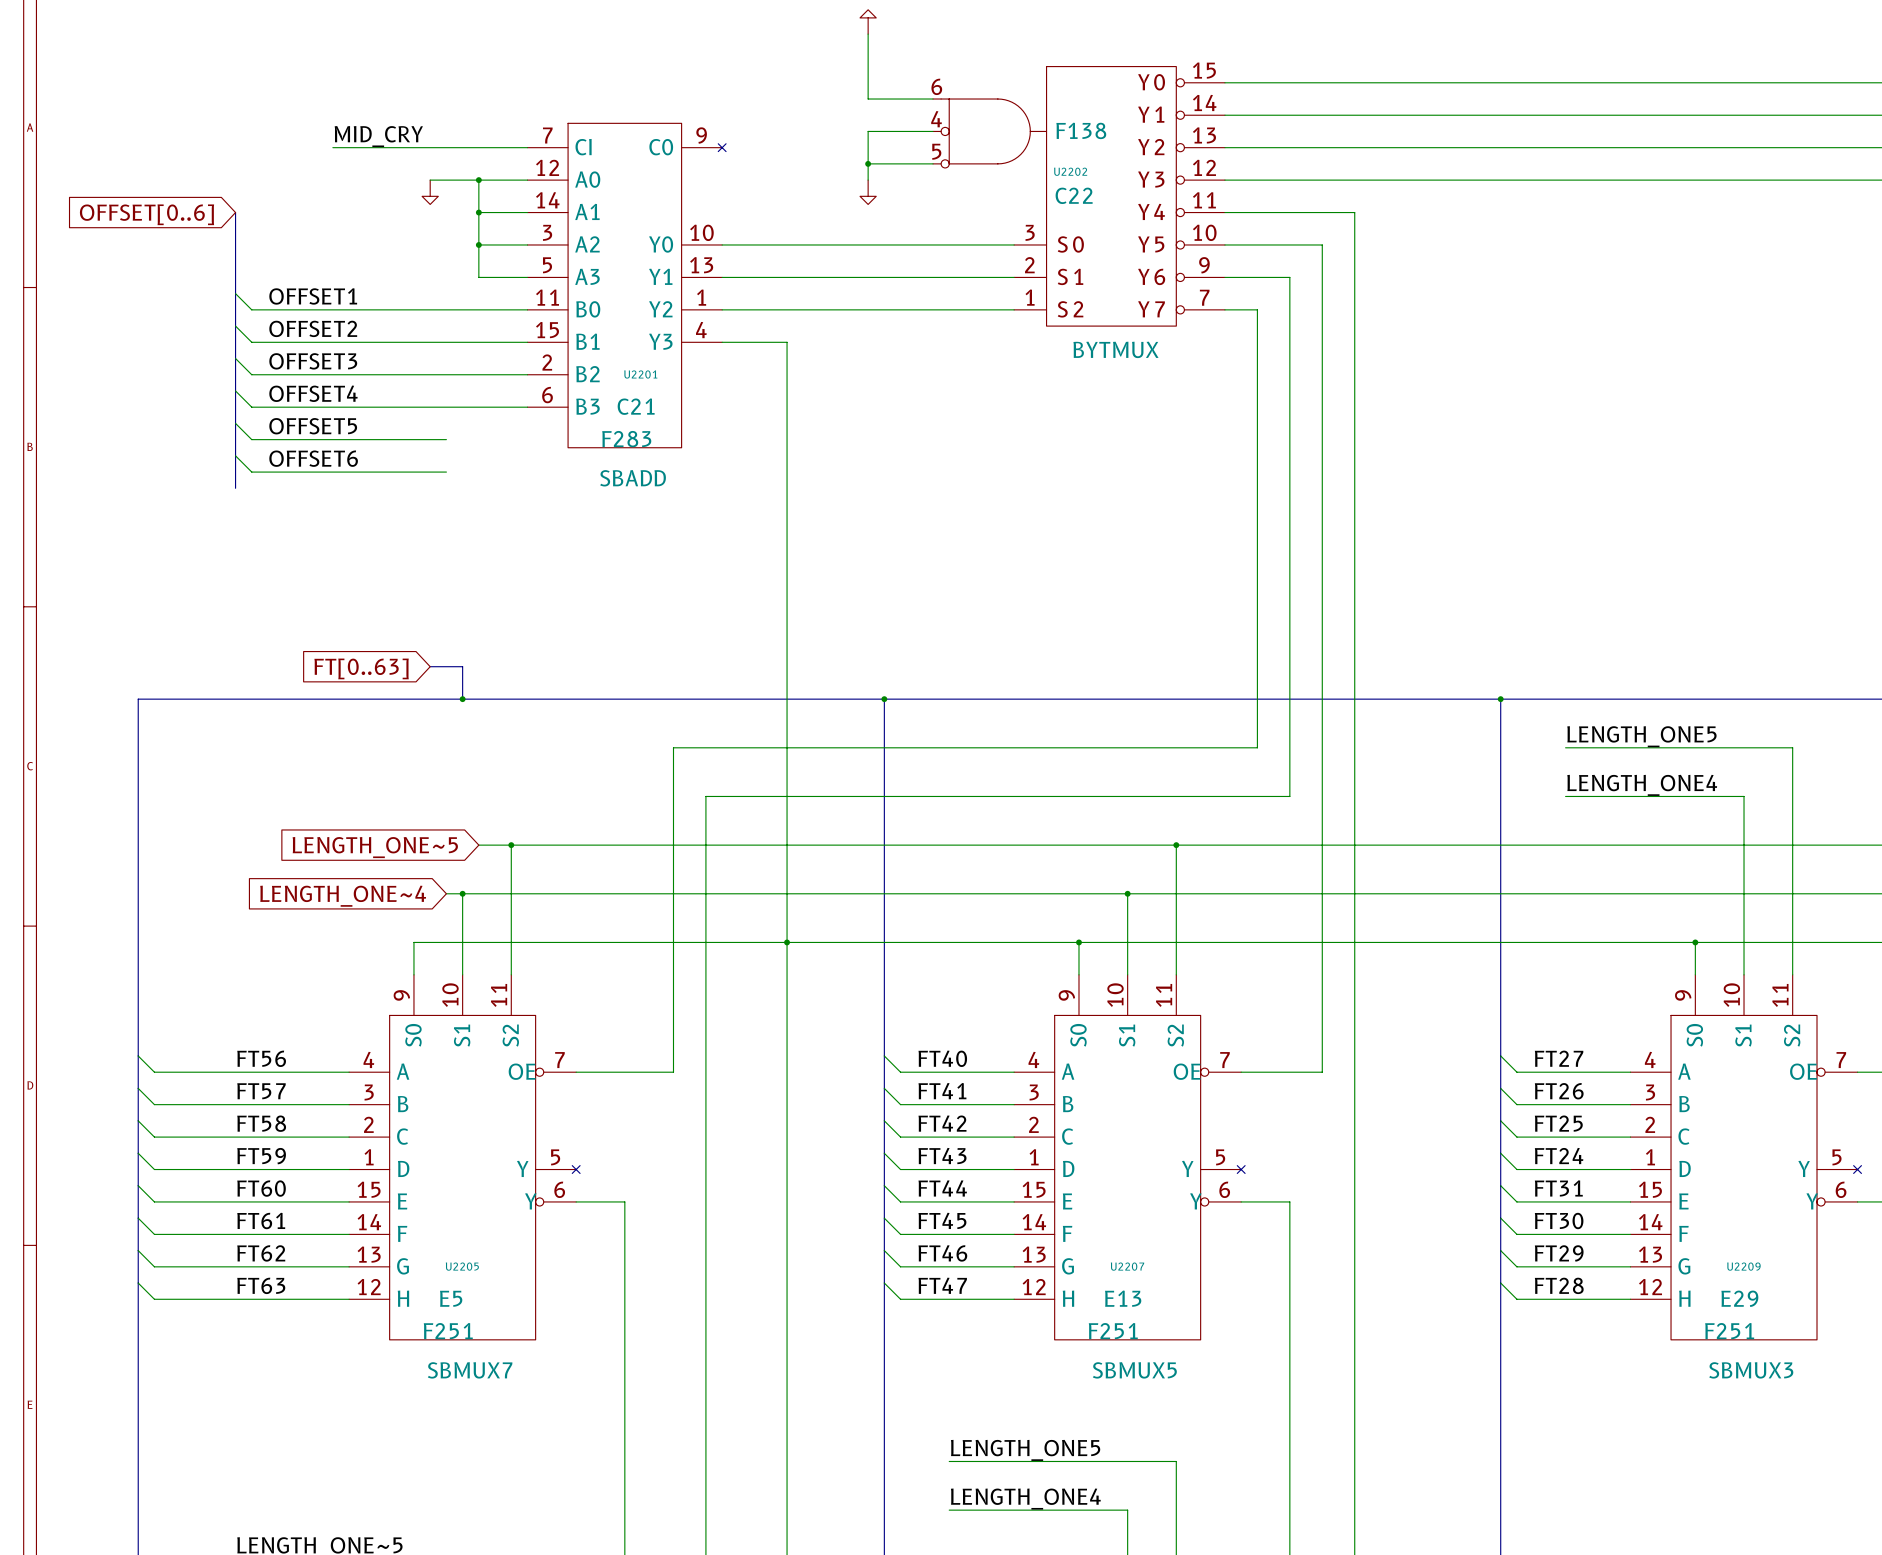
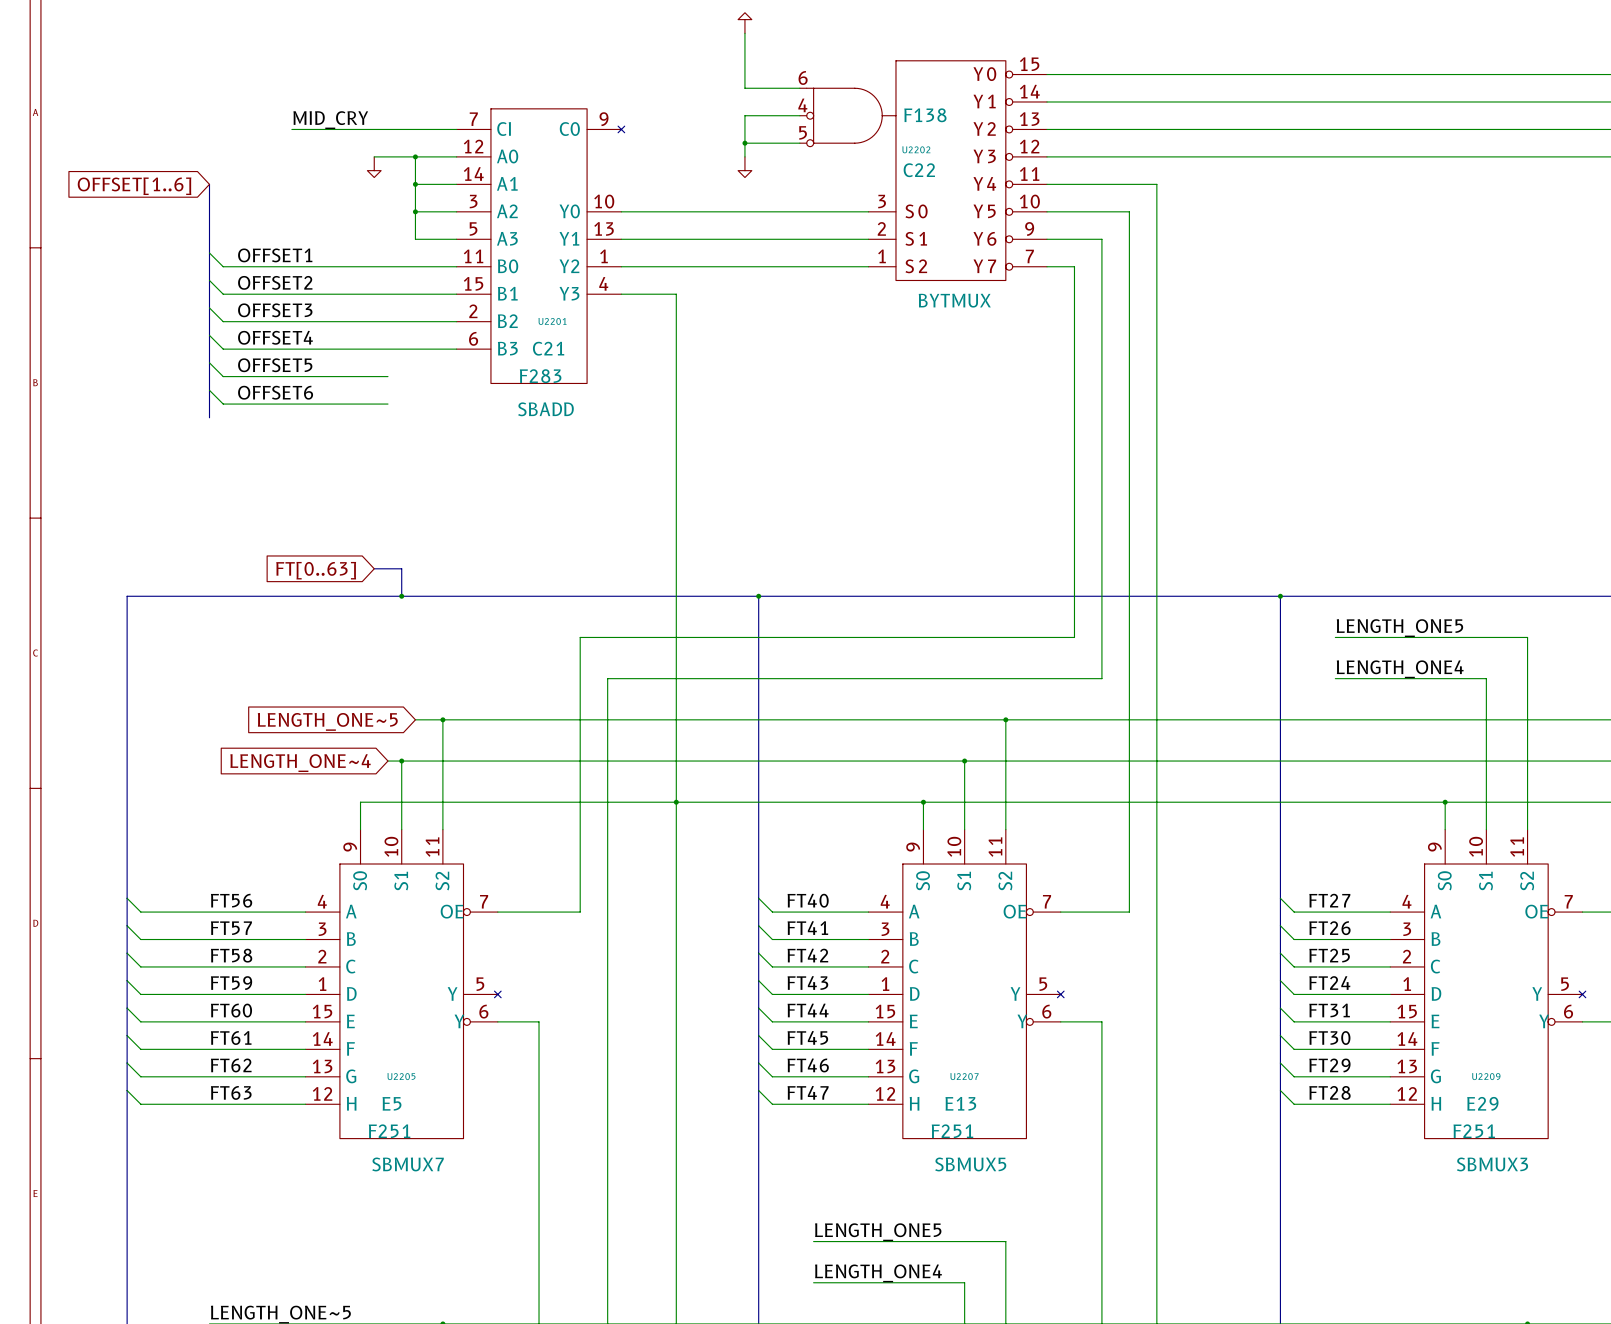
global label: OFFSET[0..6] (147, 214) -> OFFSET[1..6] (134, 186)

